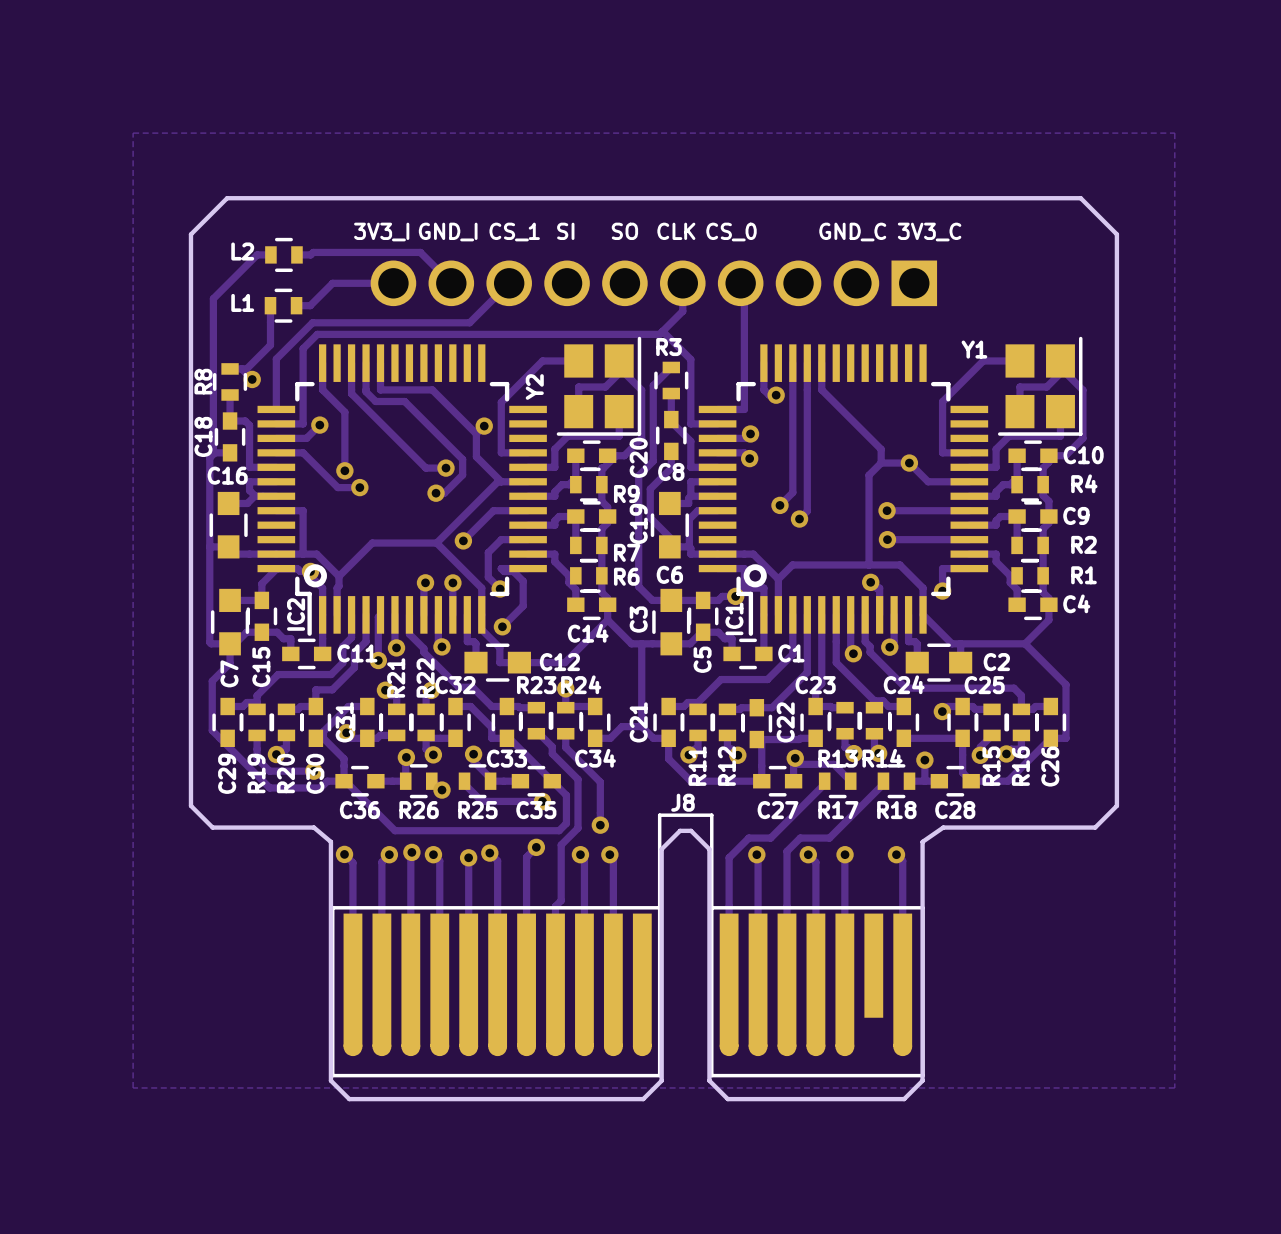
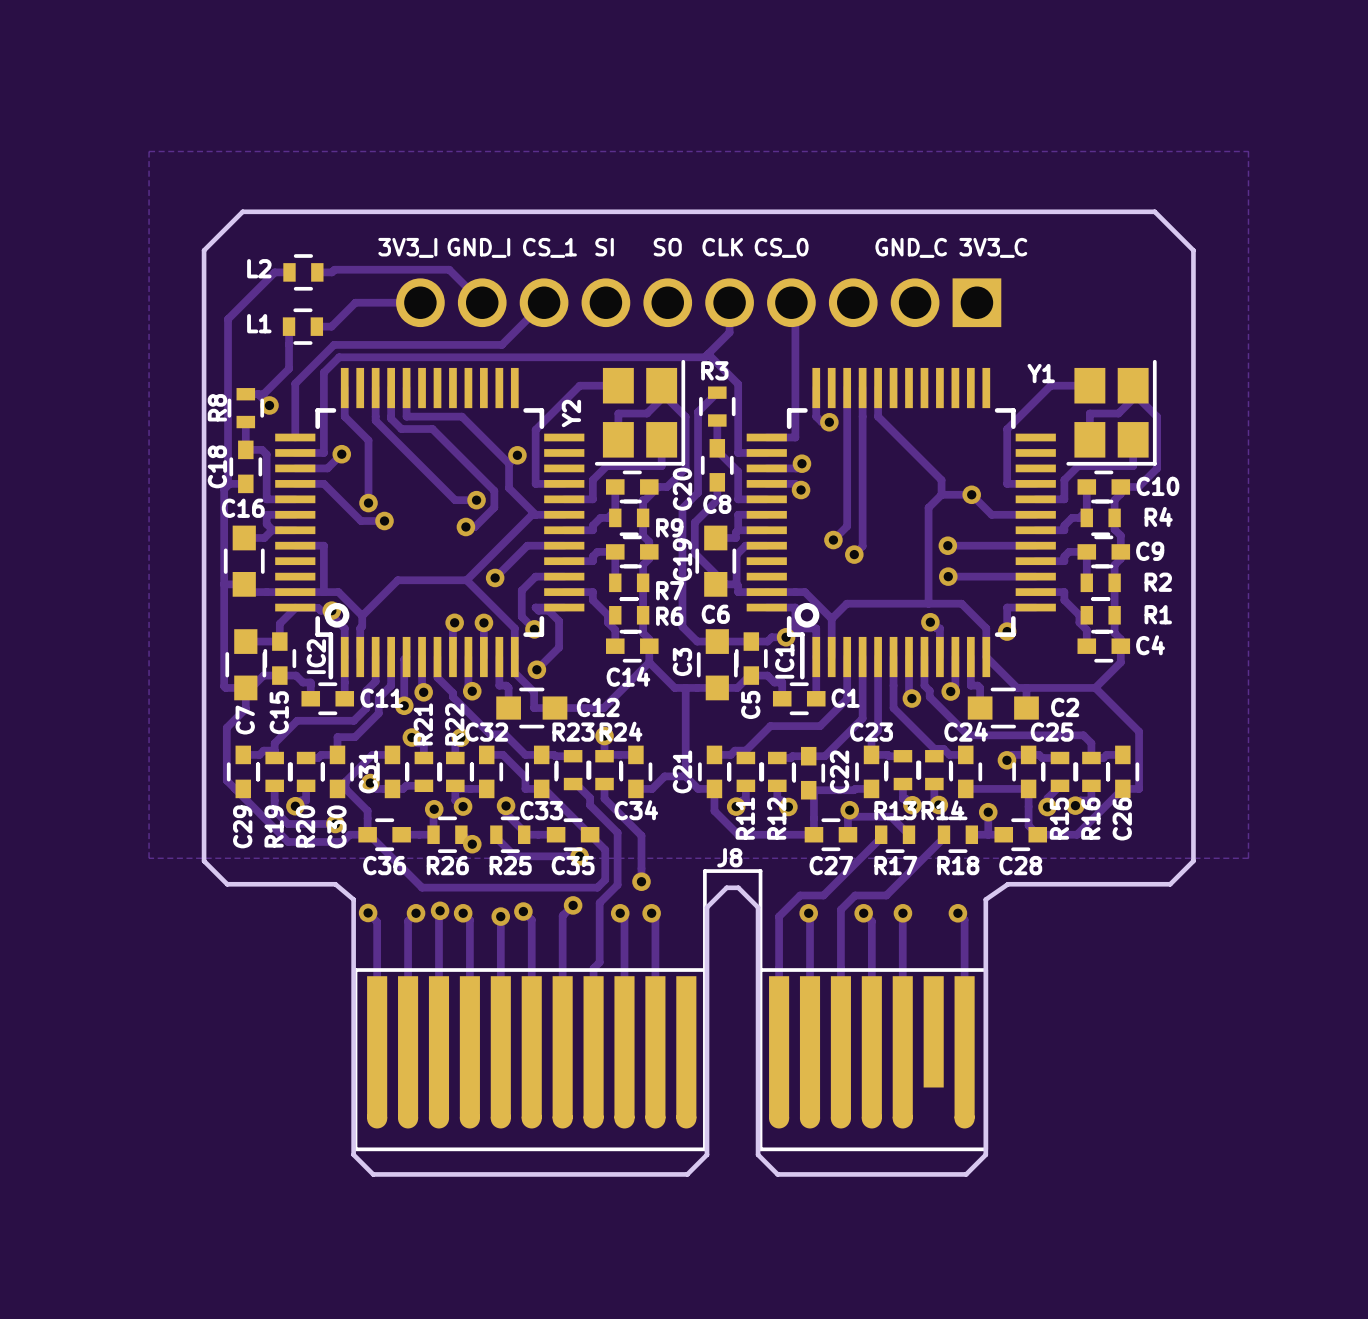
zone outline: (133, 133) (1174, 133) (1174, 1087) (133, 1087) (133, 133) -> (149, 151) (149, 858) (1248, 858) (1248, 151) (149, 151)

